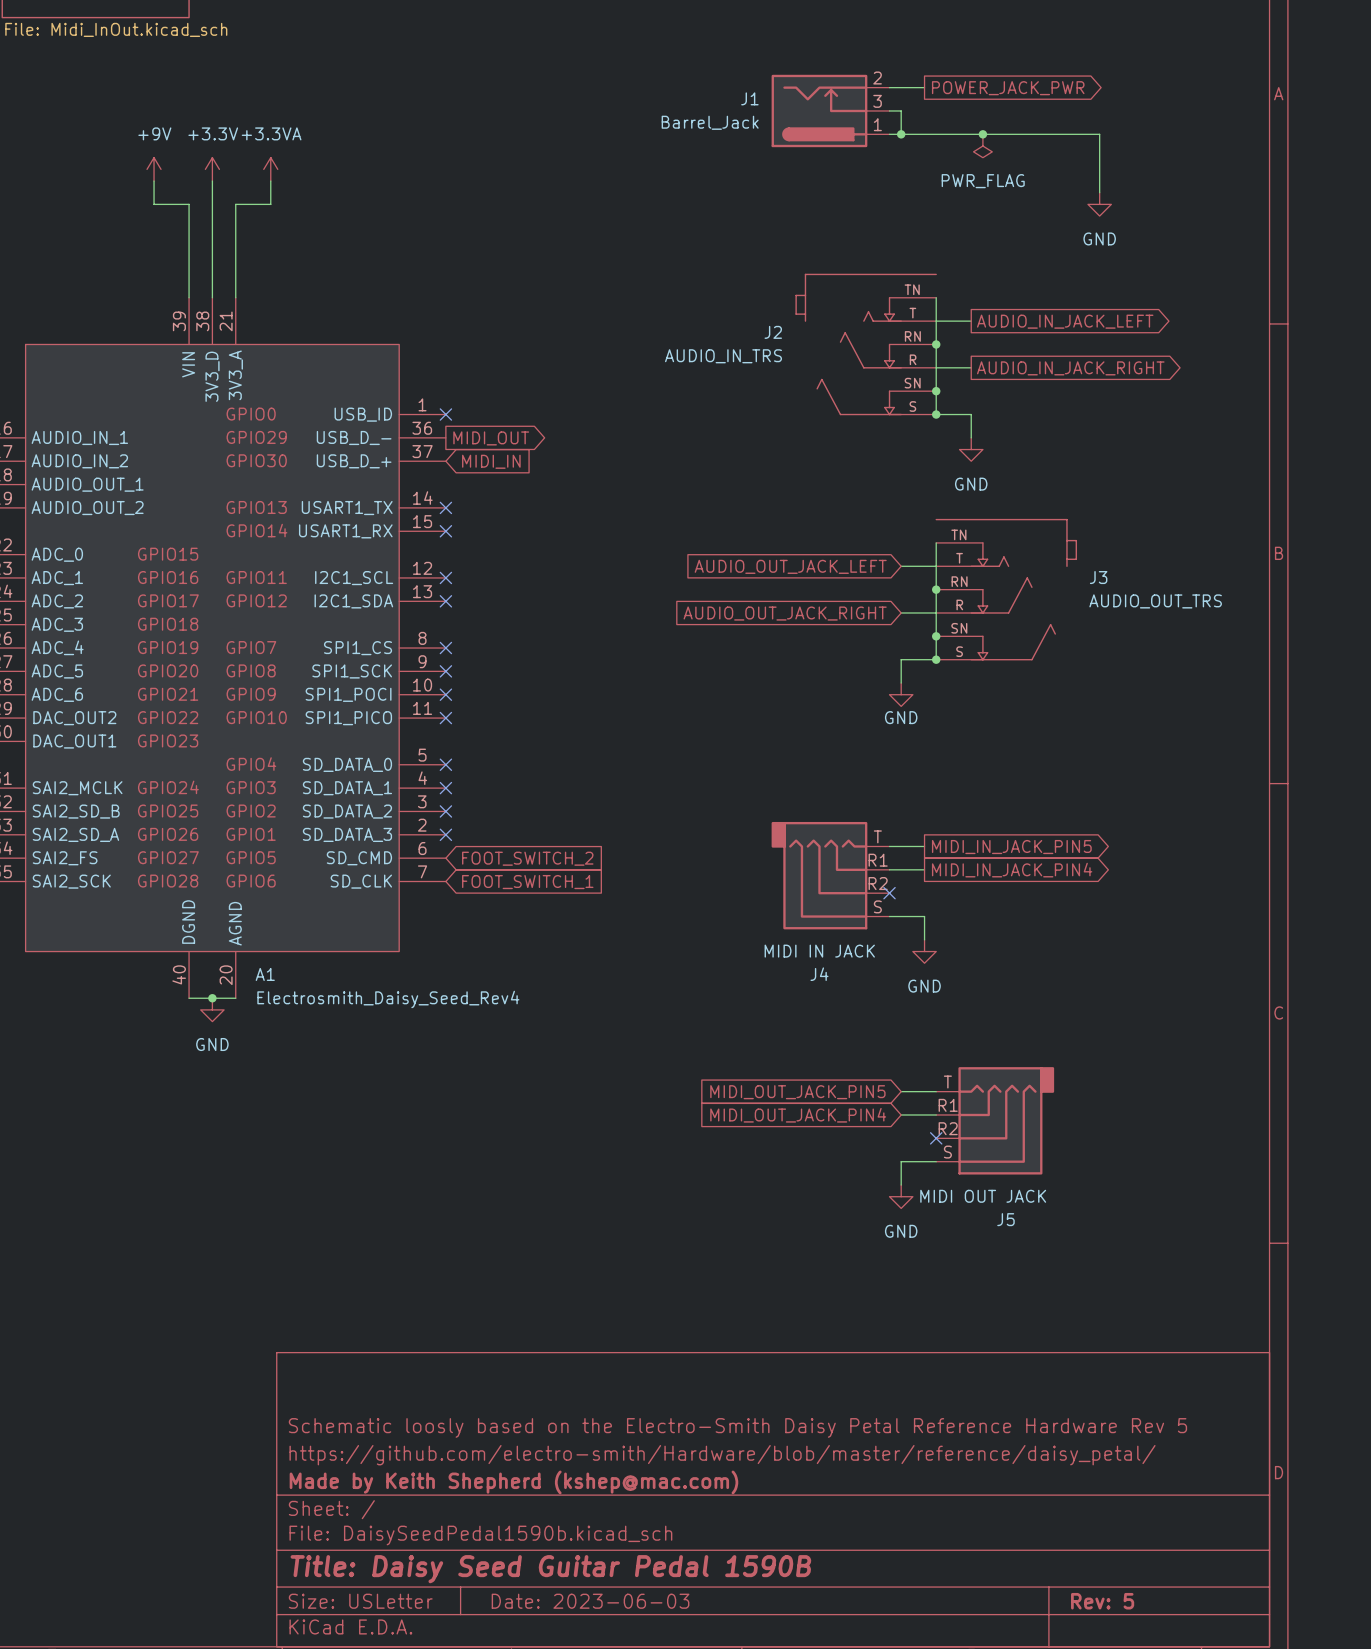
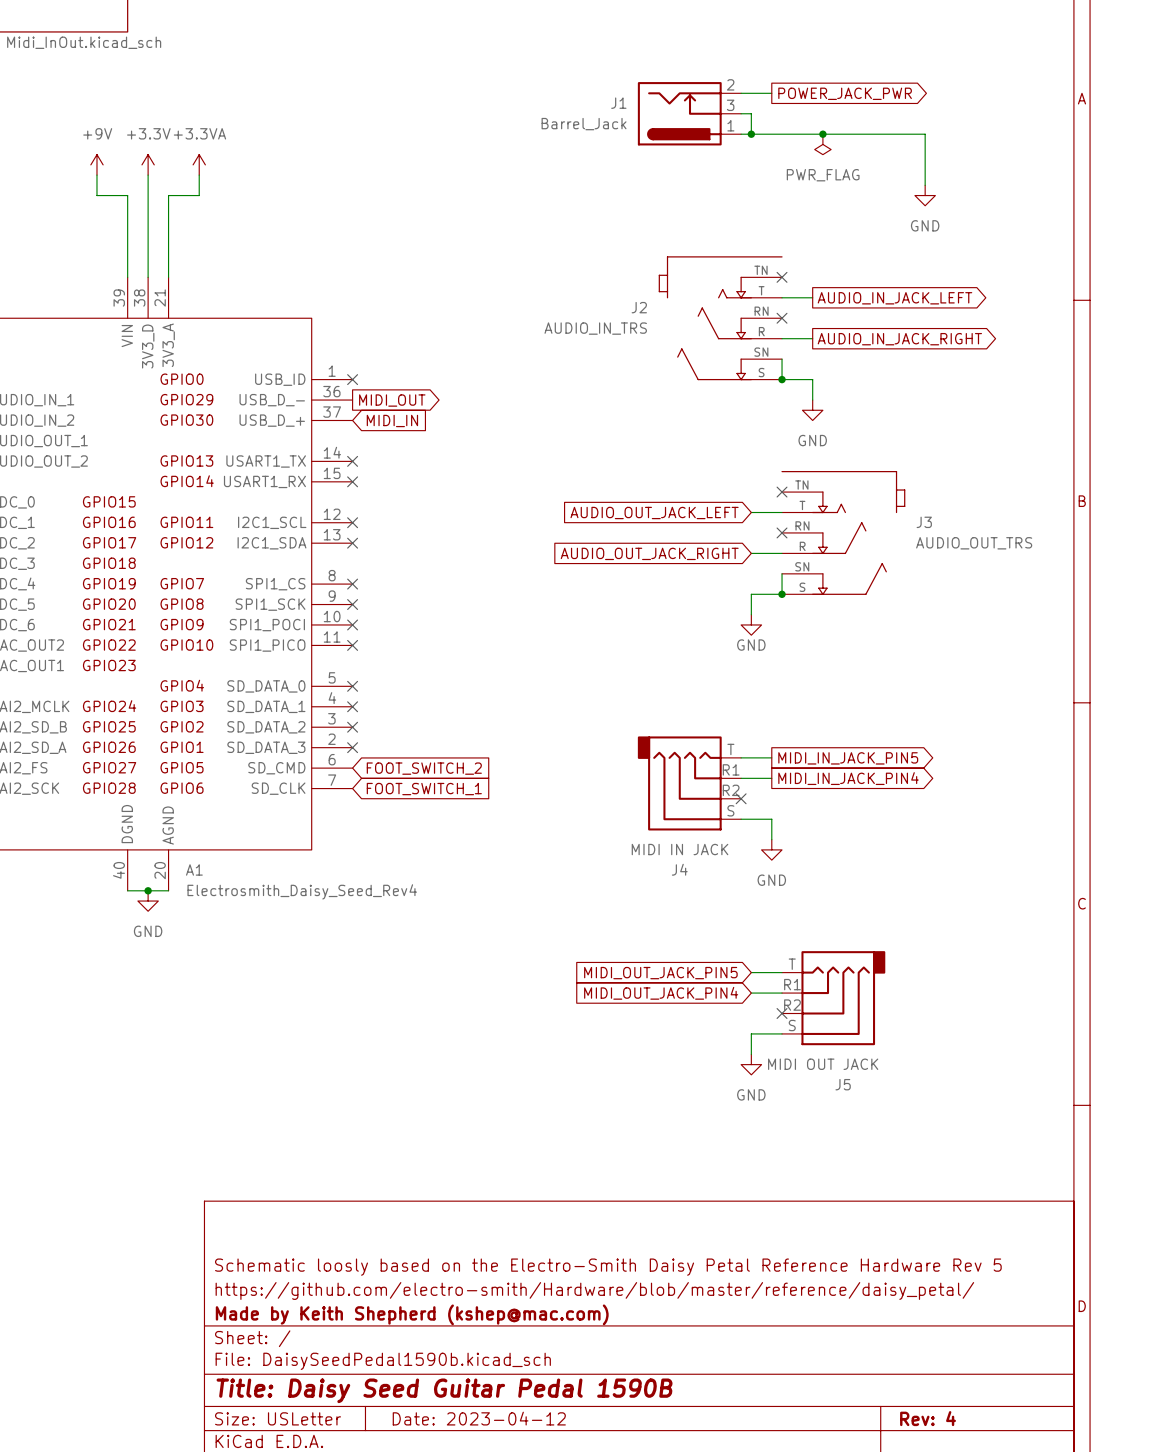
wire: (936, 297) (936, 391) -> none
no-connect mark: none -> (782, 277)
junction: (936, 344) -> none
no-connect mark: none -> (782, 318)
junction: (936, 391) -> none
wire: (936, 542) (936, 636) -> none
no-connect mark: none -> (782, 492)
junction: (936, 589) -> none
no-connect mark: none -> (782, 532)
junction: (936, 636) -> none
title block: Date: 2023-06-03 (590, 1601) -> Date: 2023-04-12 (479, 1418)
title block: Rev: 5 (1102, 1601) -> Rev: 4 (928, 1418)

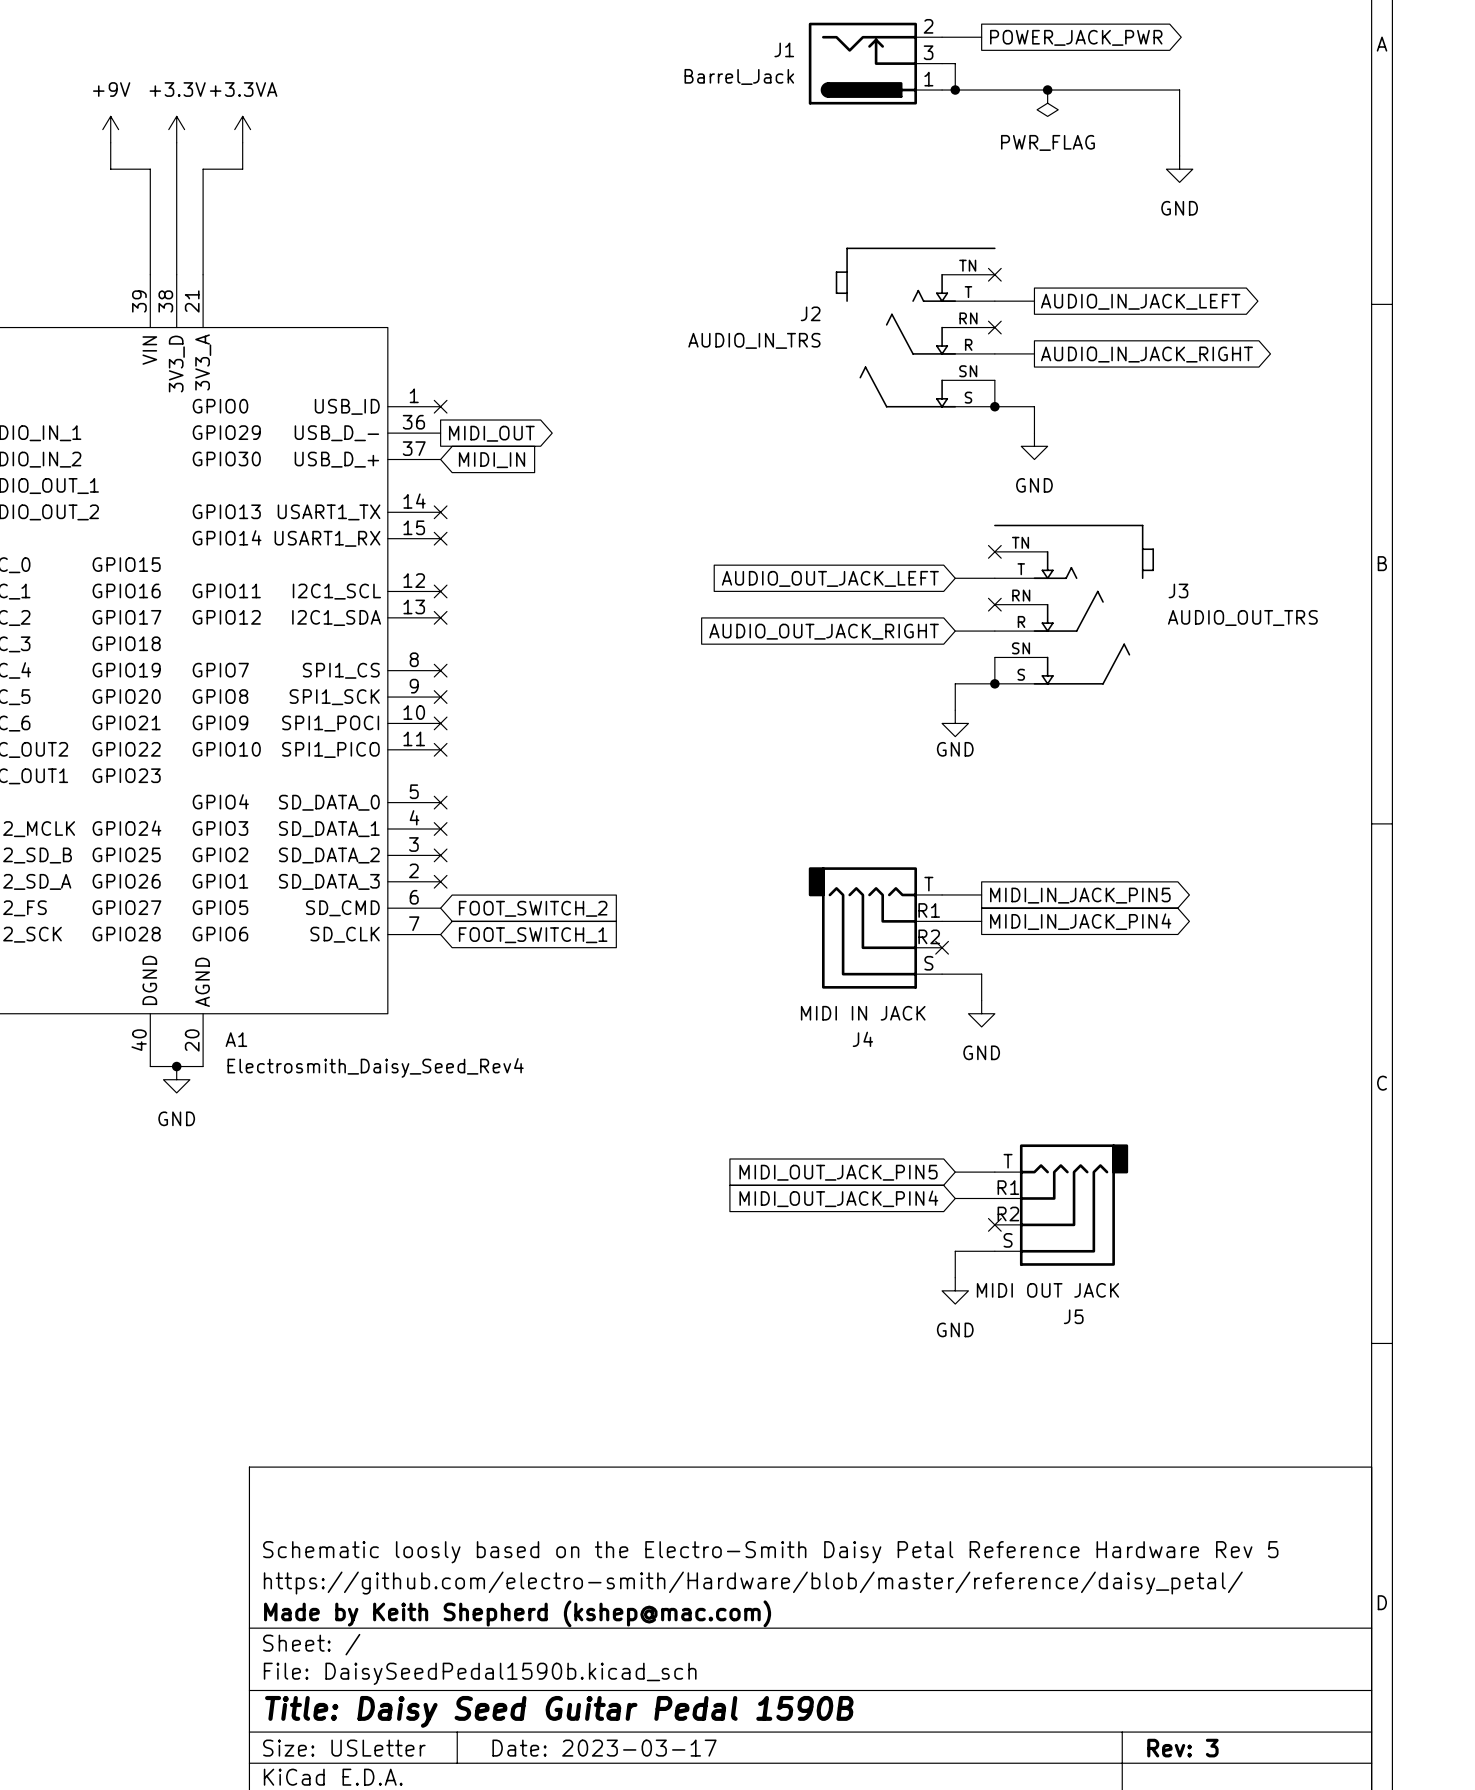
title block: Date: 2023-04-12 (479, 1418) -> Date: 2023-03-17 (604, 1748)
title block: Rev: 4 (928, 1418) -> Rev: 3 (1182, 1748)

